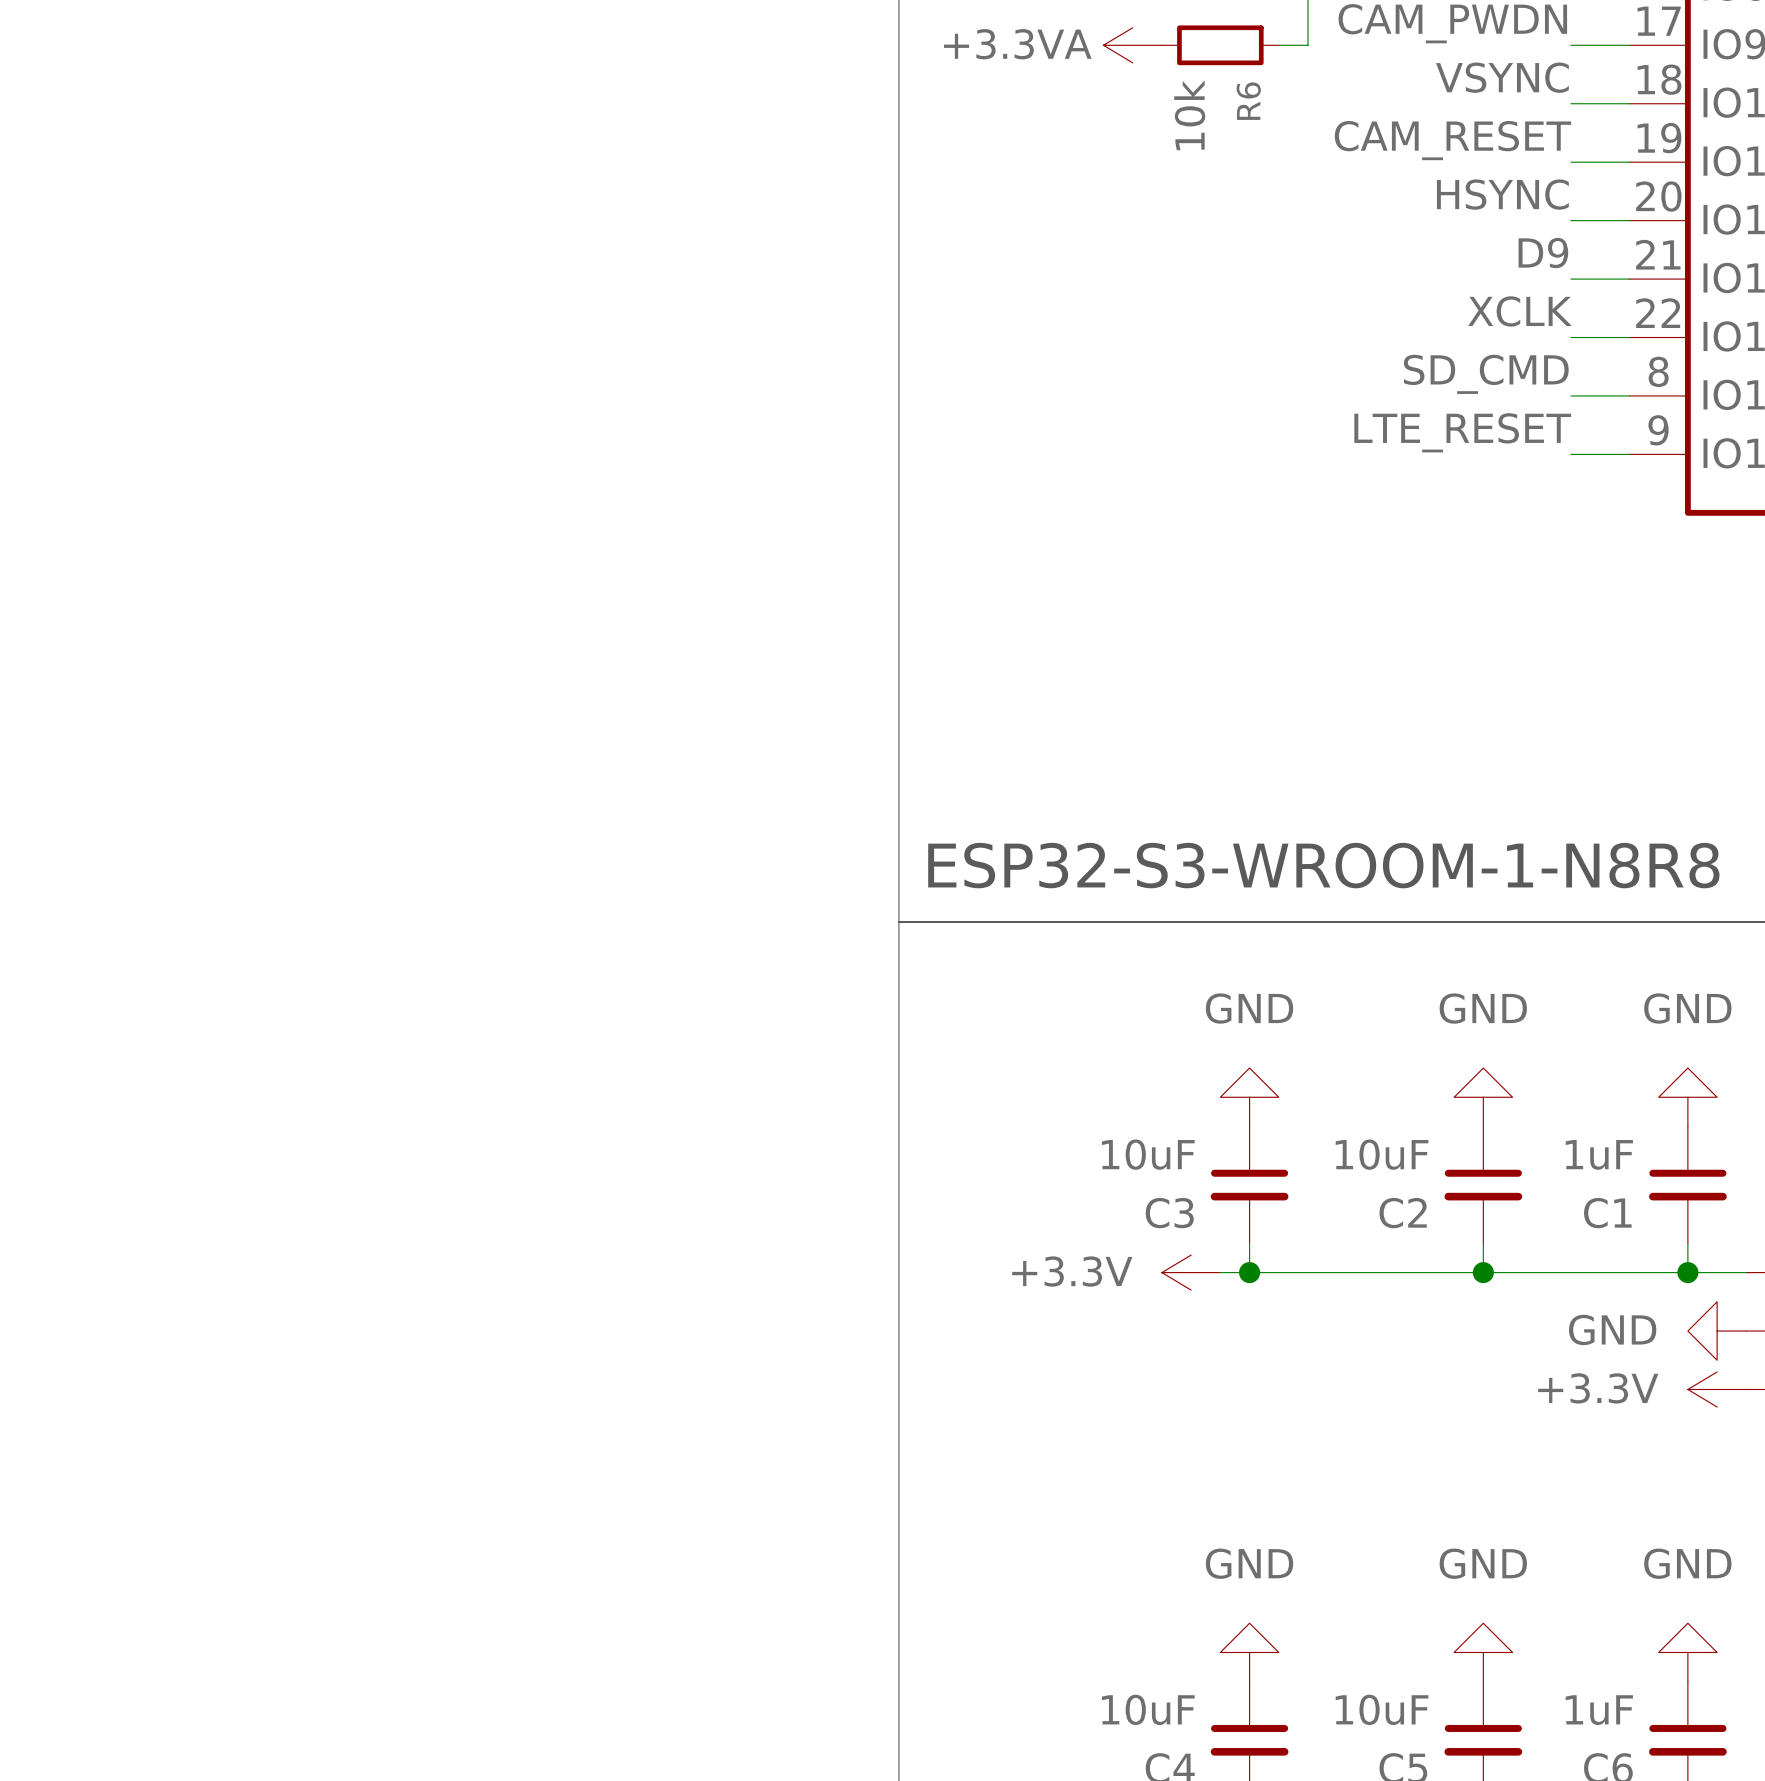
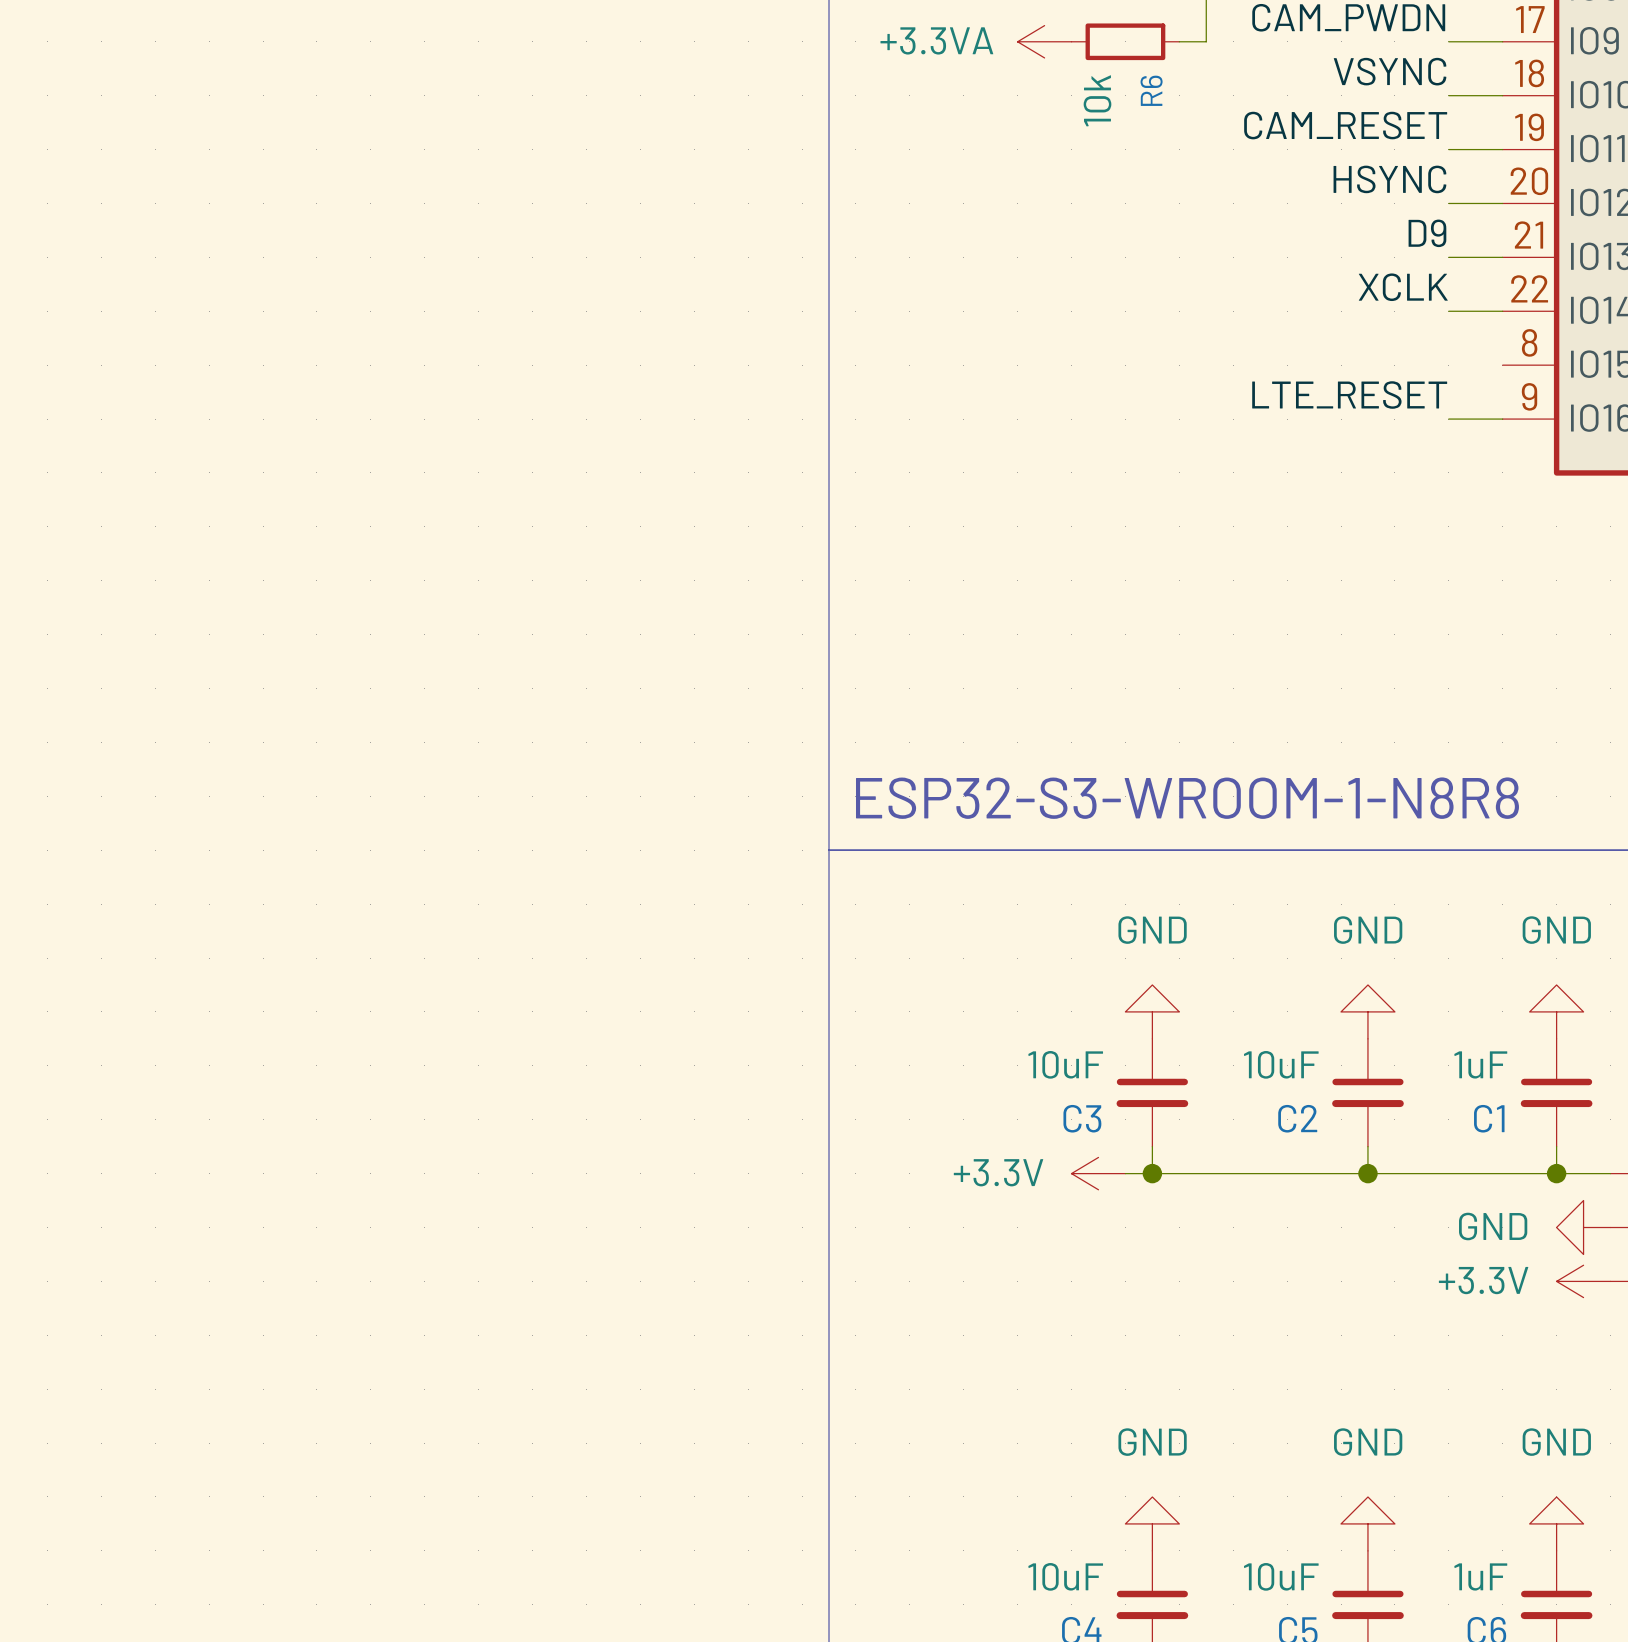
label: SD_CMD (1486, 374) -> none
wire: (1571, 395) (1629, 395) -> none

